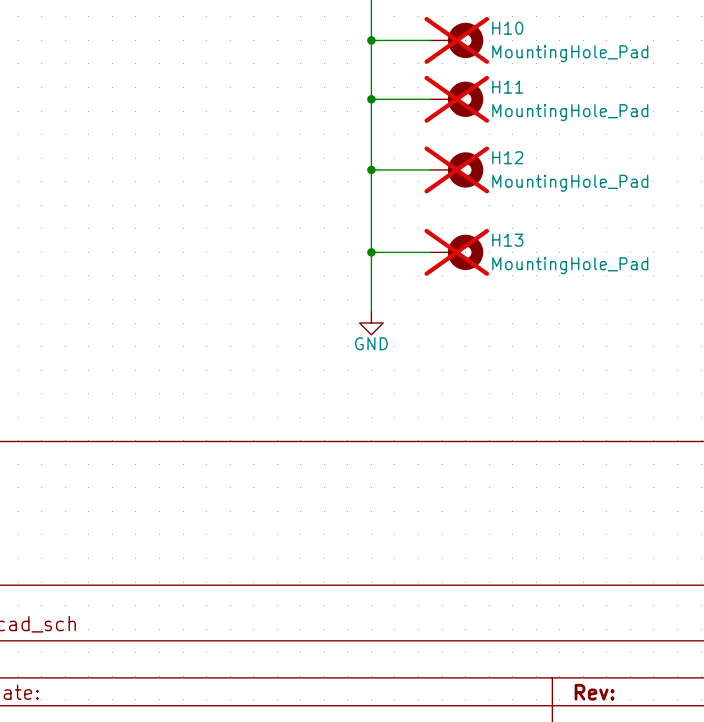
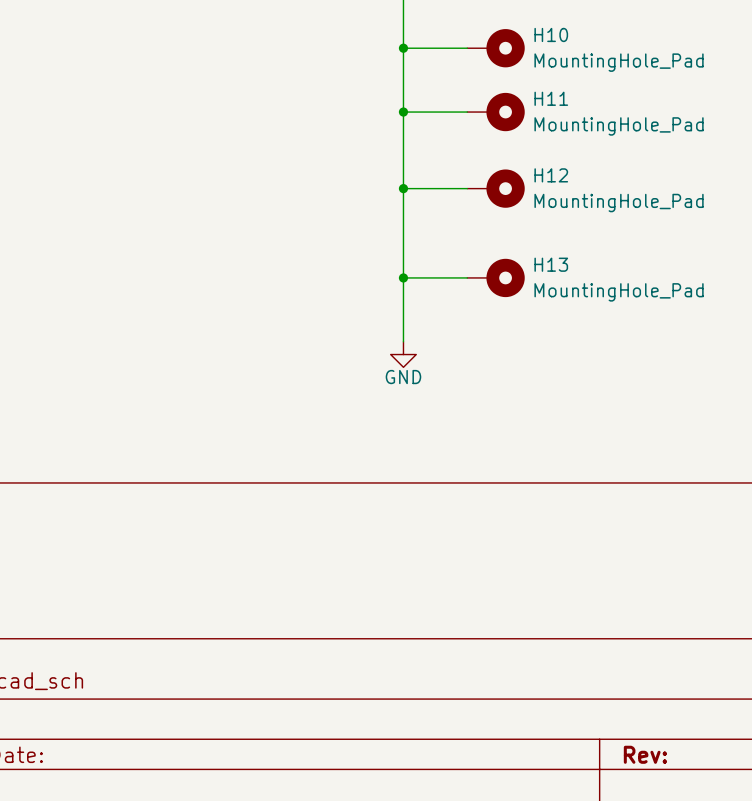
H10 do-not-place cross: (456, 40) -> none
H11 do-not-place cross: (456, 99) -> none
H12 do-not-place cross: (456, 169) -> none
H13 do-not-place cross: (456, 252) -> none

